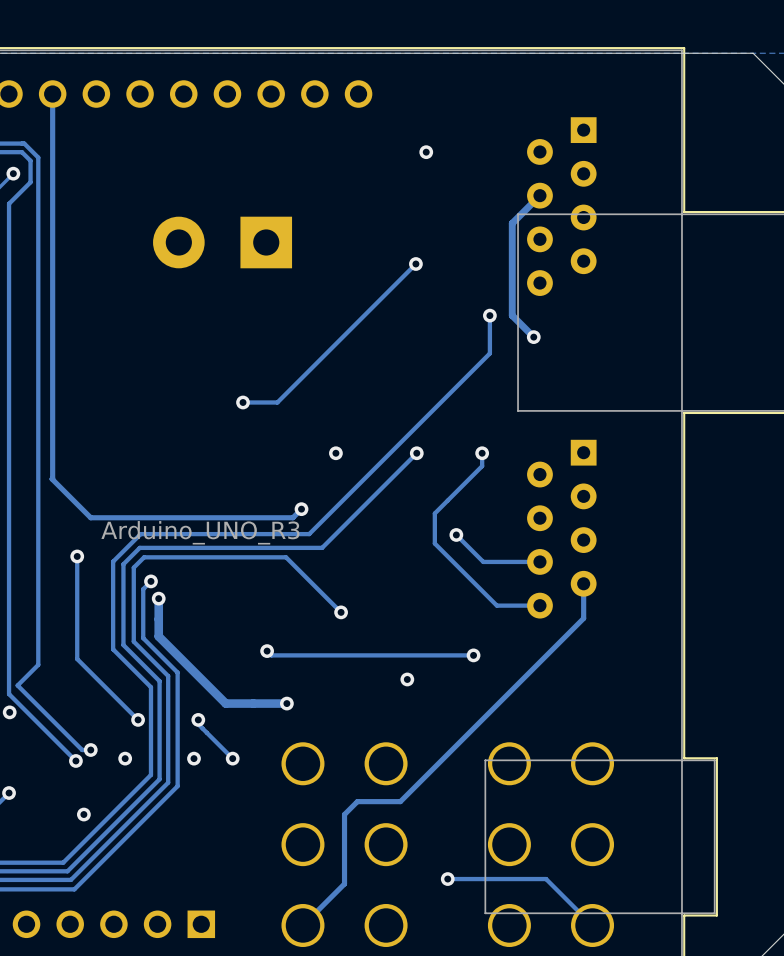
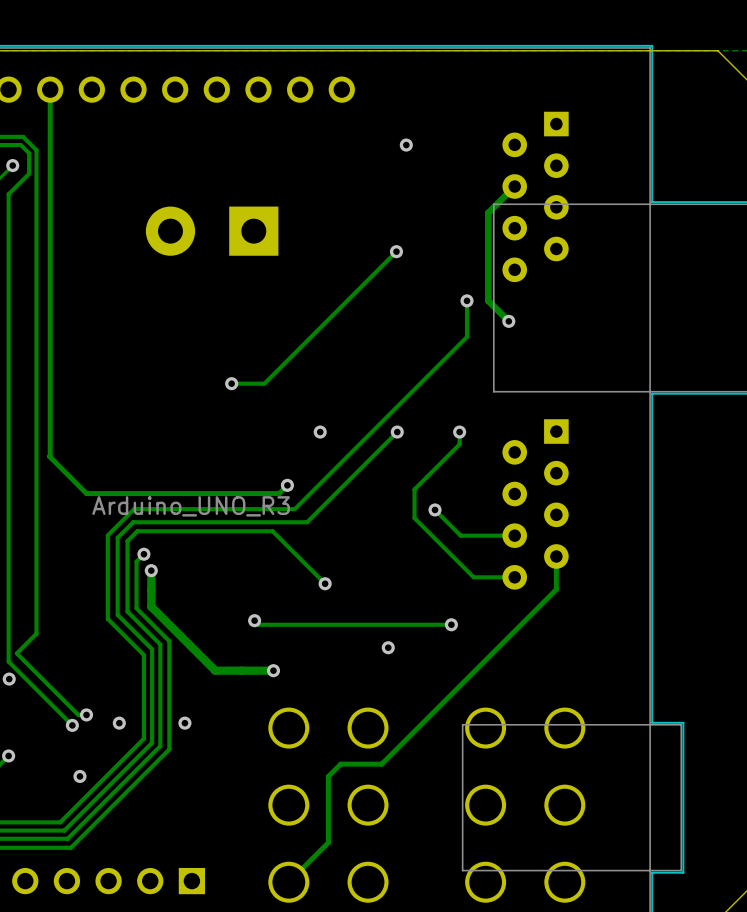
track: (77, 556) (77, 659) (138, 719) -> none
via: (77, 556) -> none
via: (138, 719) -> none
track: (198, 719) (198, 724) (232, 758) -> none
via: (198, 719) -> none
via: (232, 758) -> none
track: (447, 879) (546, 879) (592, 925) -> none
via: (447, 879) -> none

